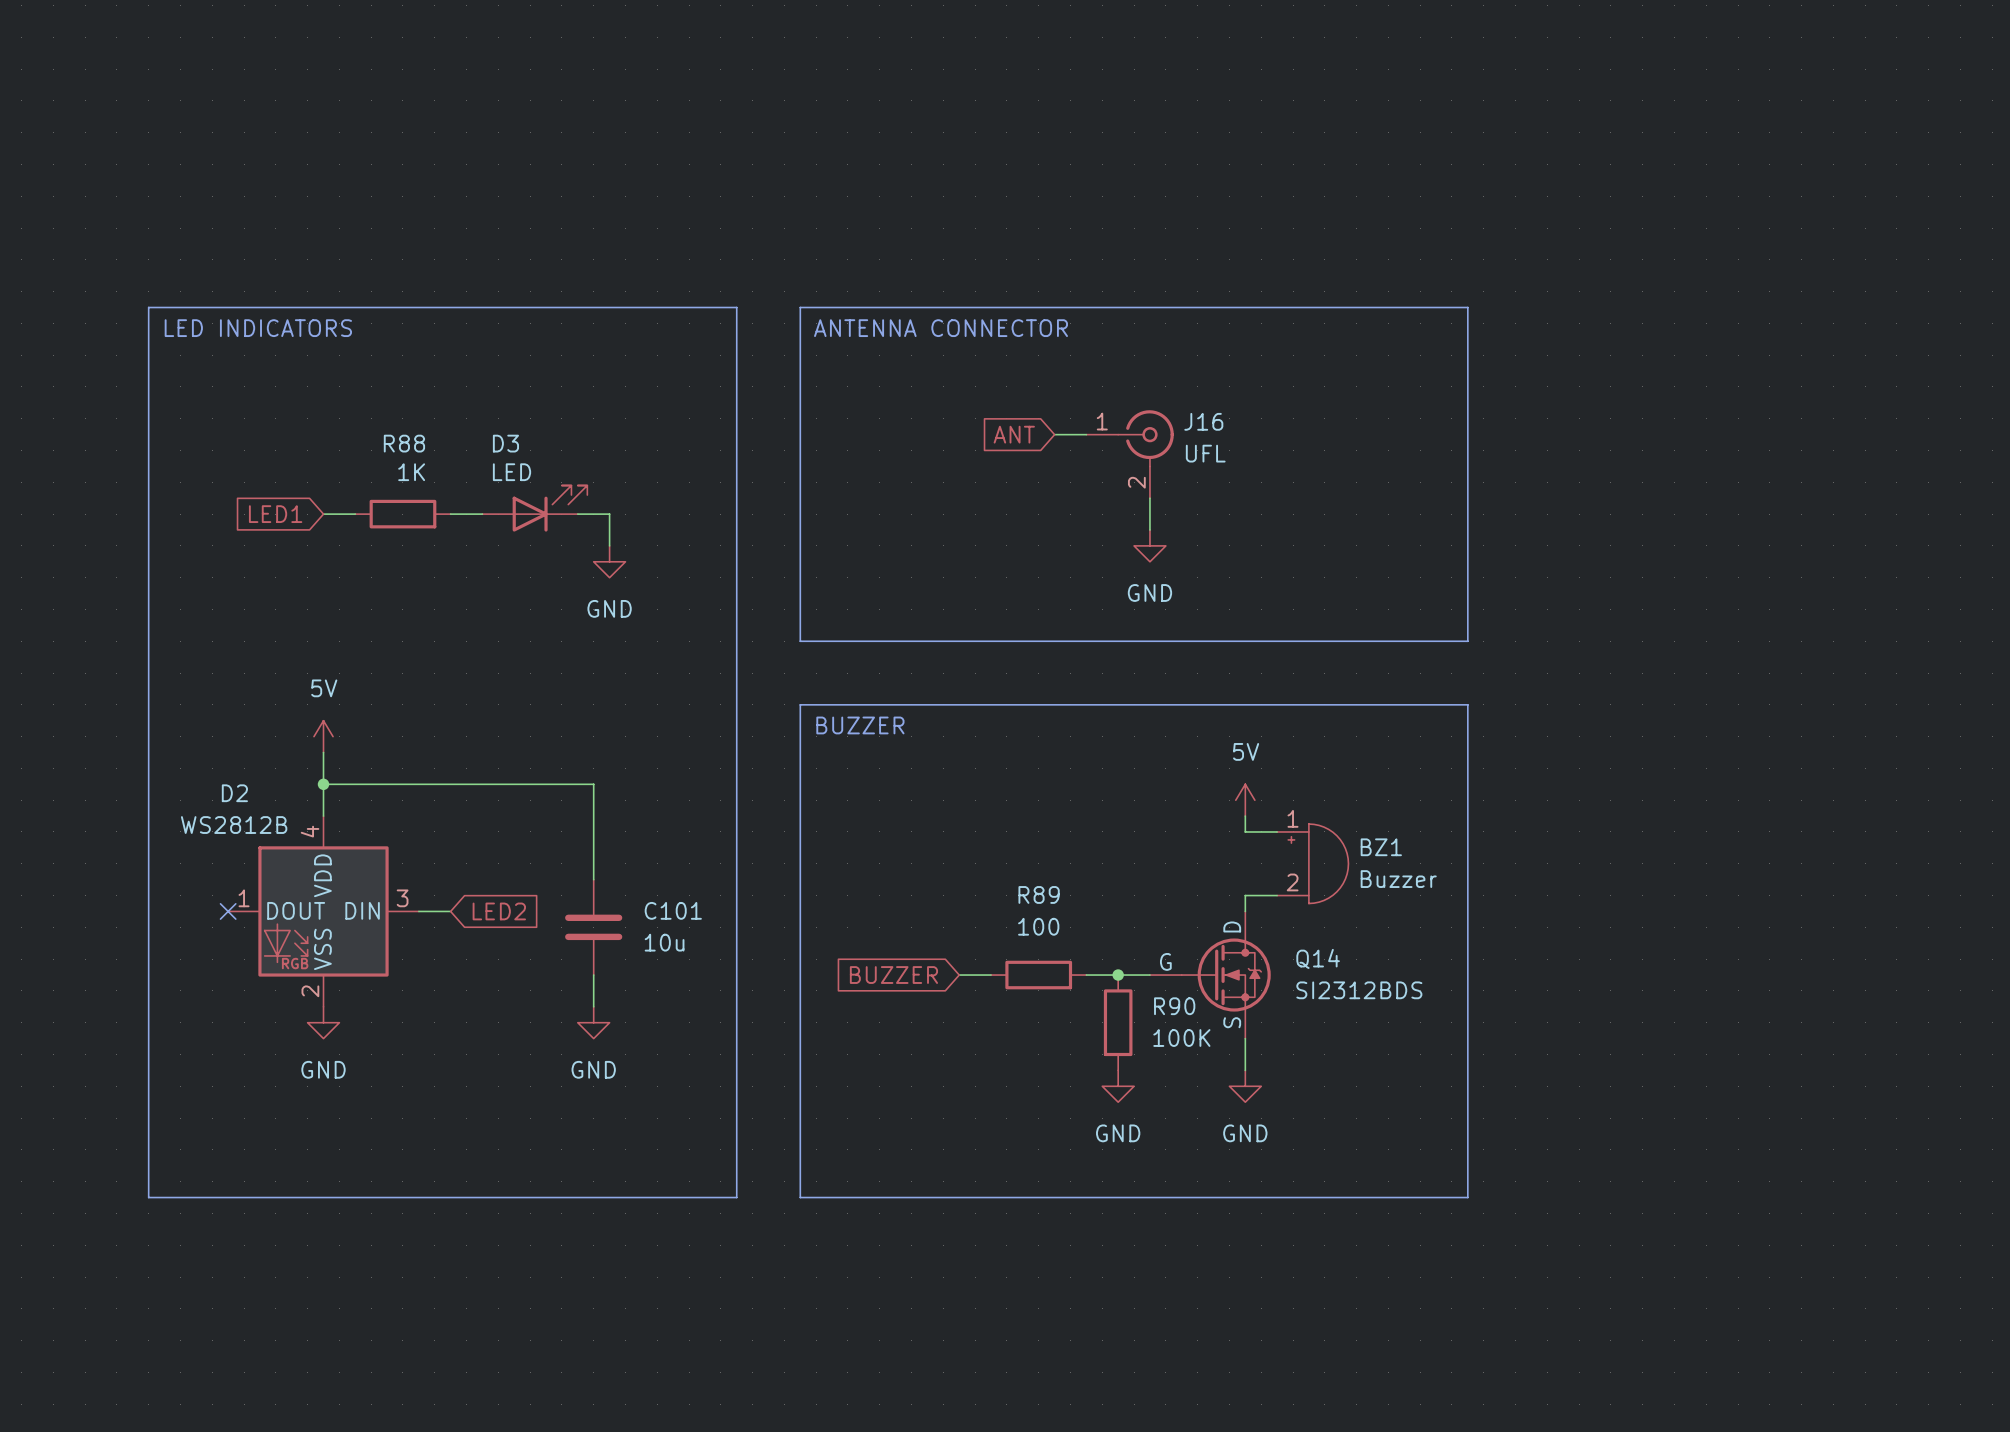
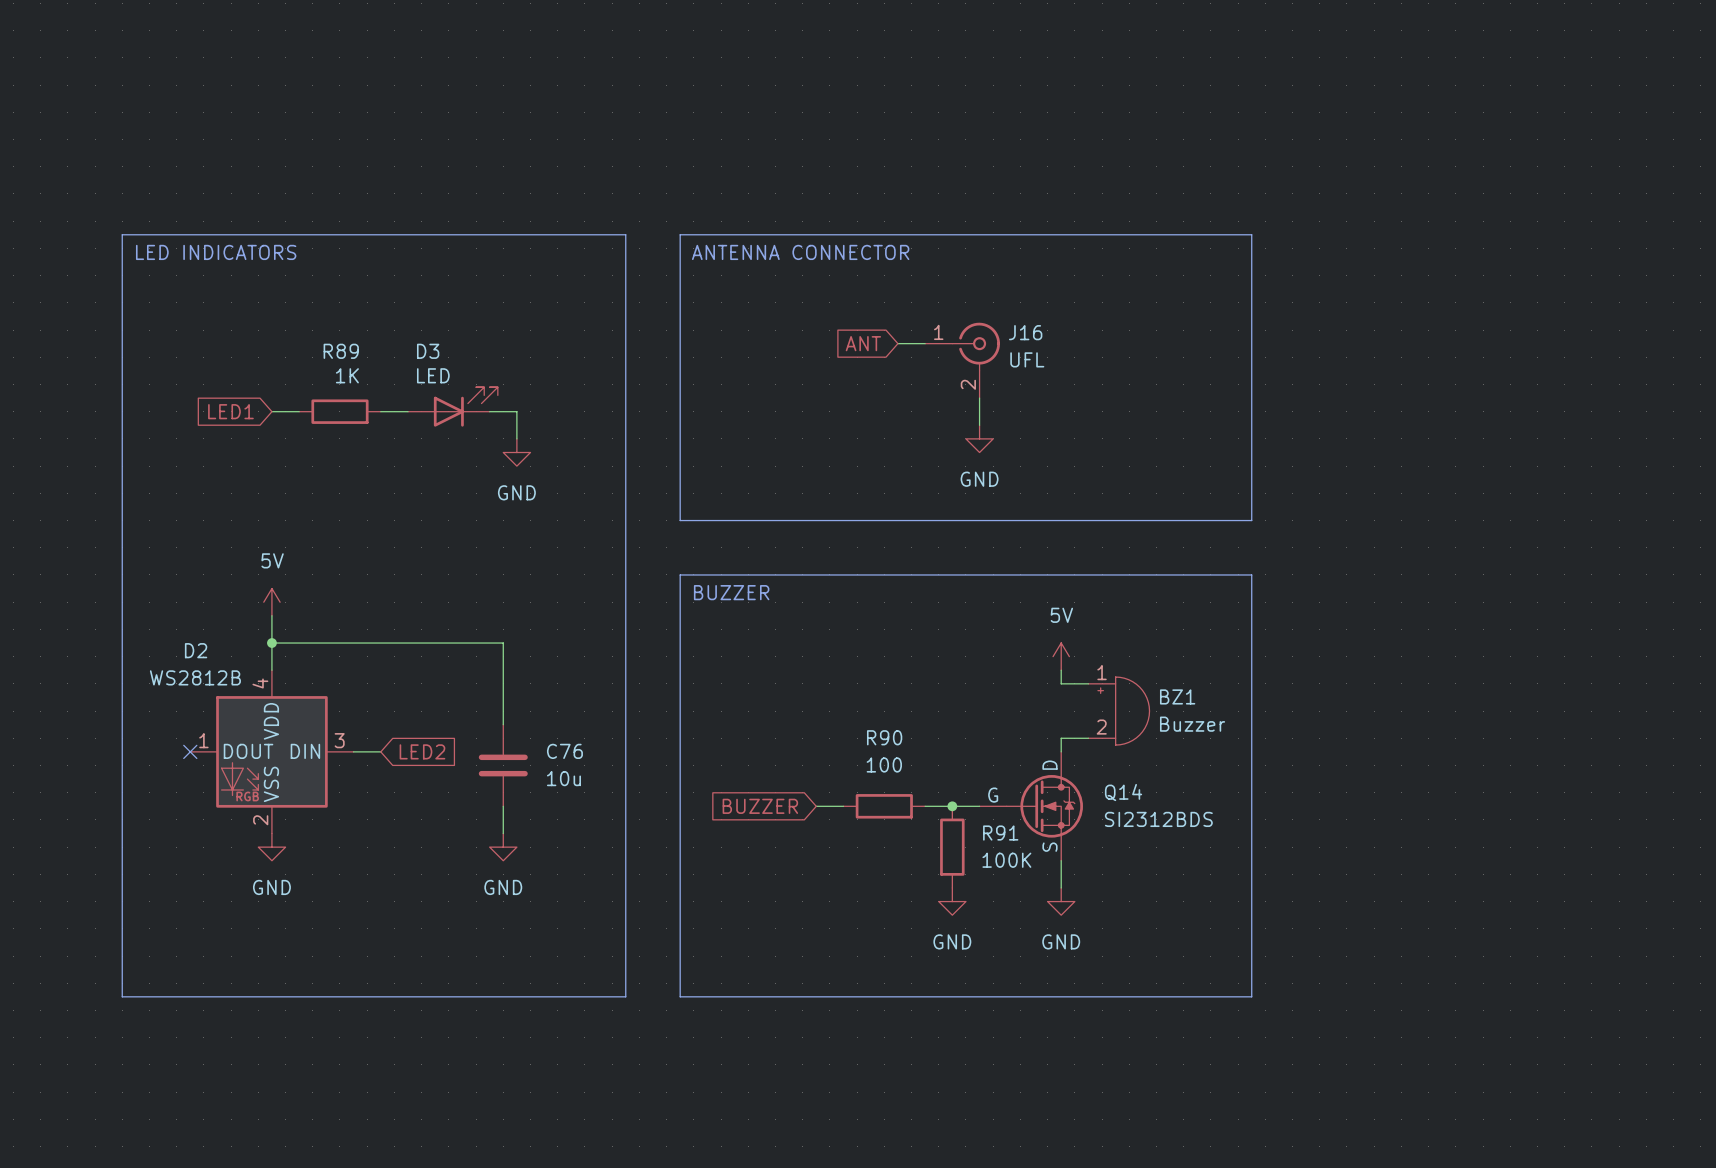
R88 name: R88 (404, 443) -> R89 (341, 351)
R89 name: R89 (1039, 894) -> R90 (884, 737)
C101 name: C101 (673, 910) -> C76 (564, 751)
R90 name: R90 (1174, 1006) -> R91 (1000, 833)

